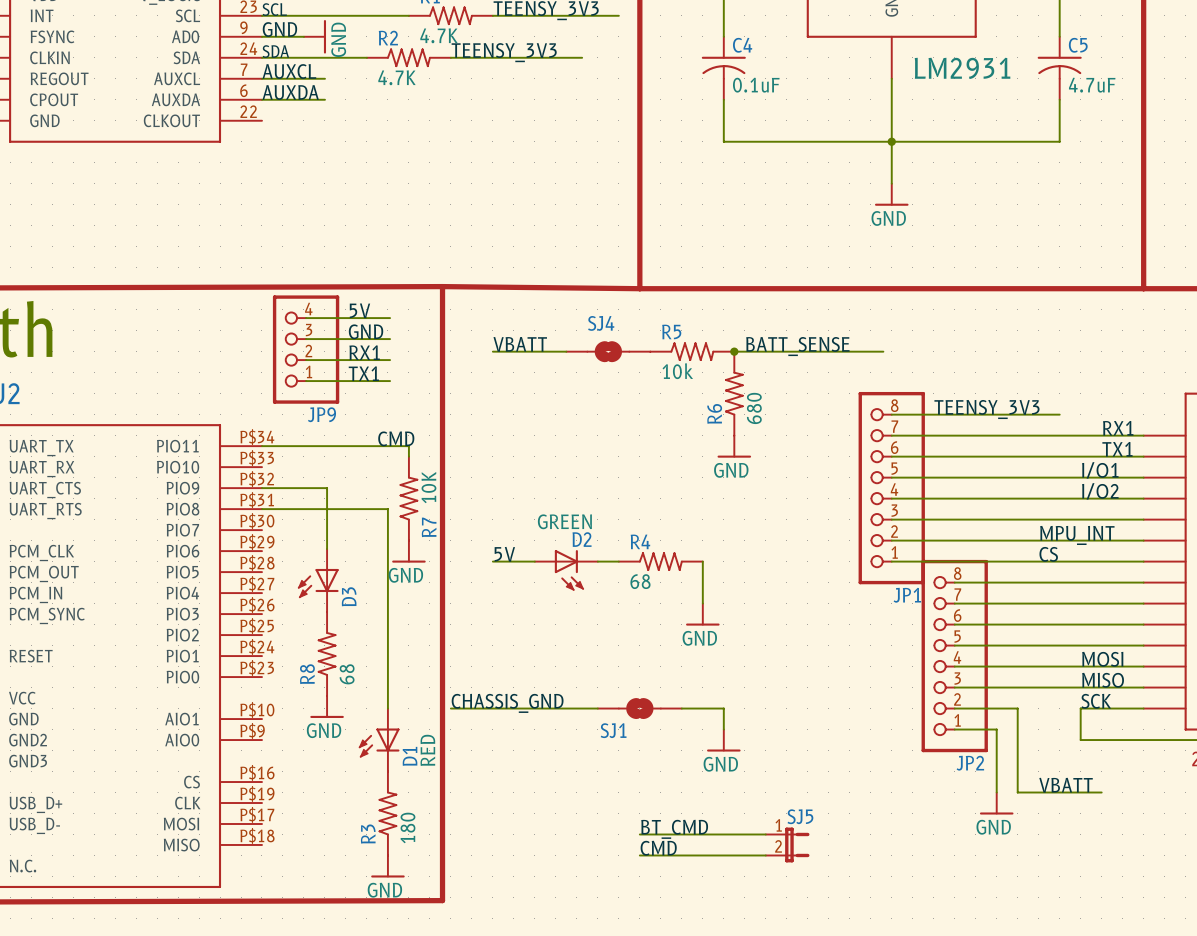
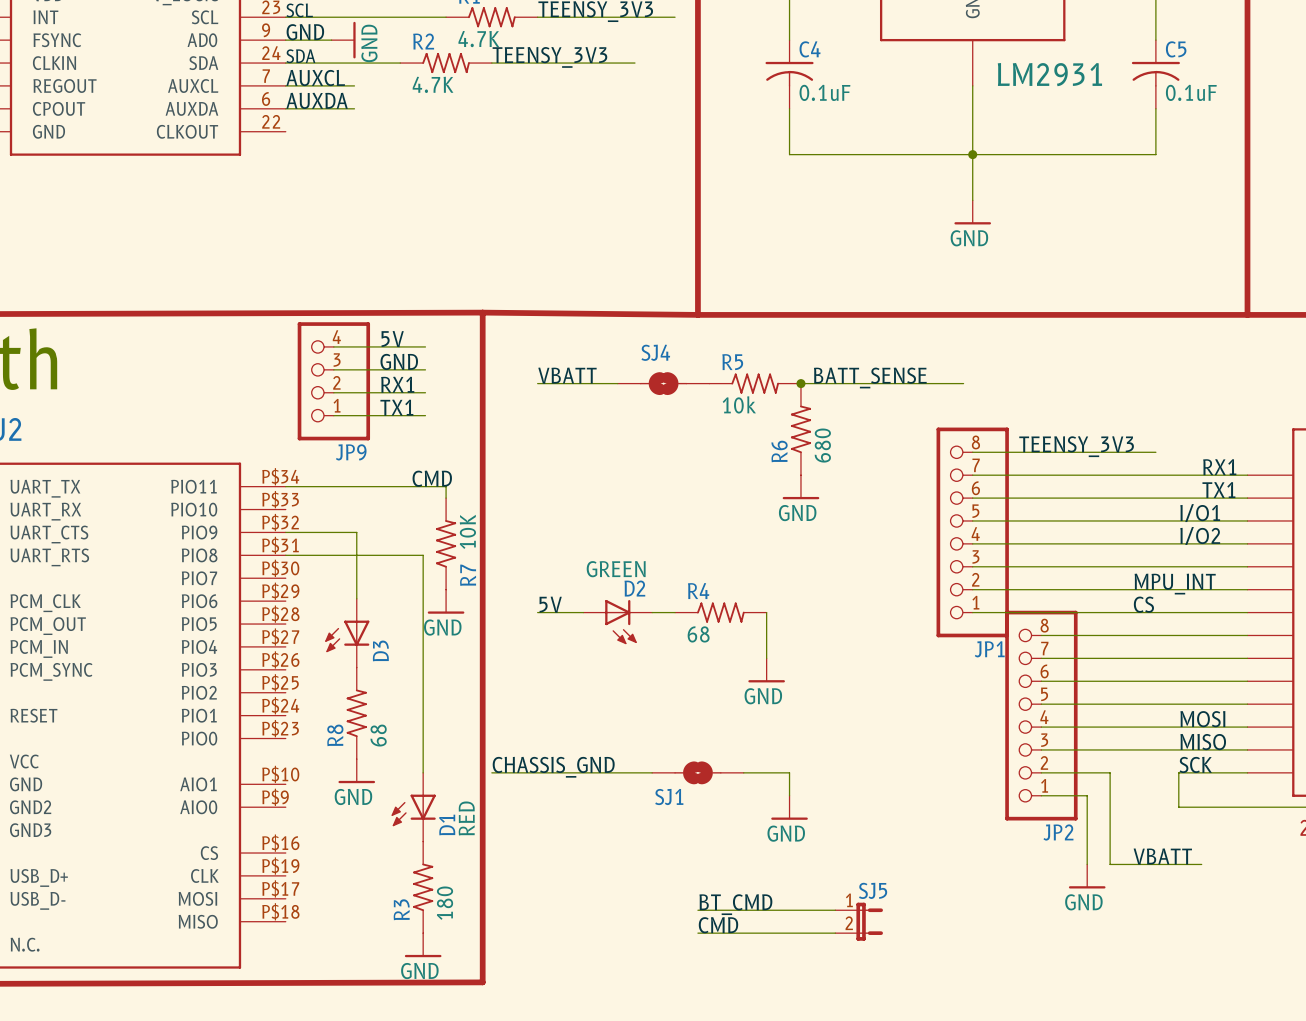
C5 value: 4.7uF (1092, 85) -> 0.1uF (1191, 92)

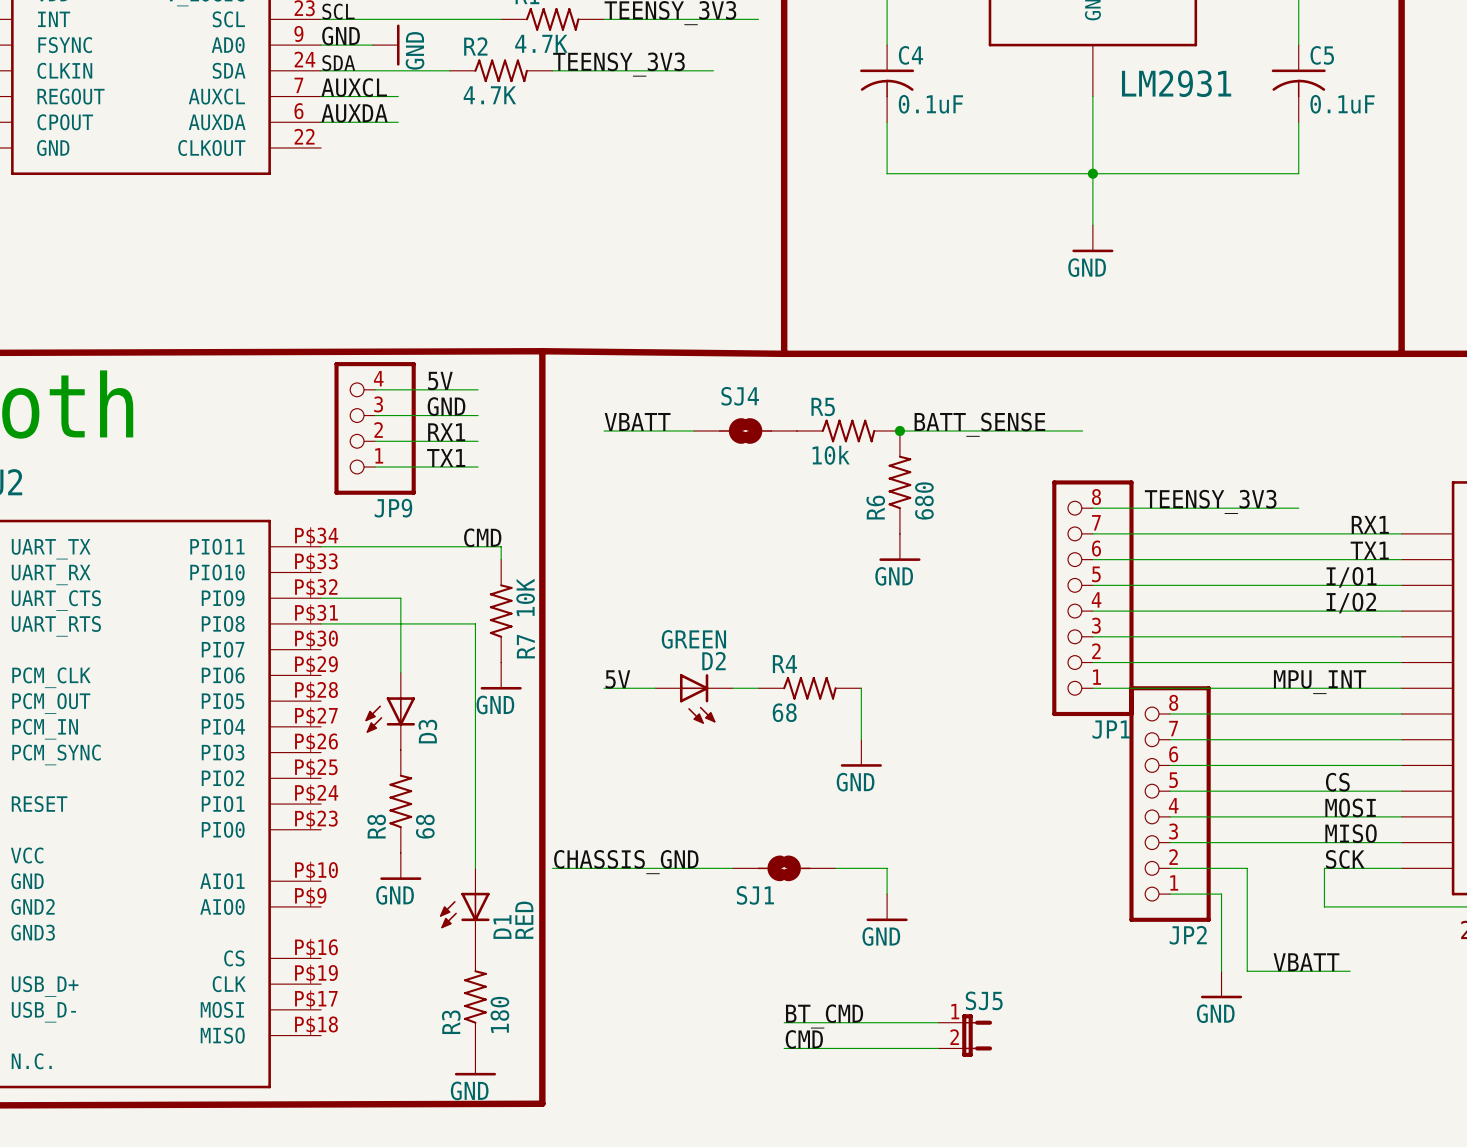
label: MPU_INT (1175, 584) -> none
label: CS (1143, 604) -> MPU_INT (1320, 682)
label: none -> CS (1337, 782)

